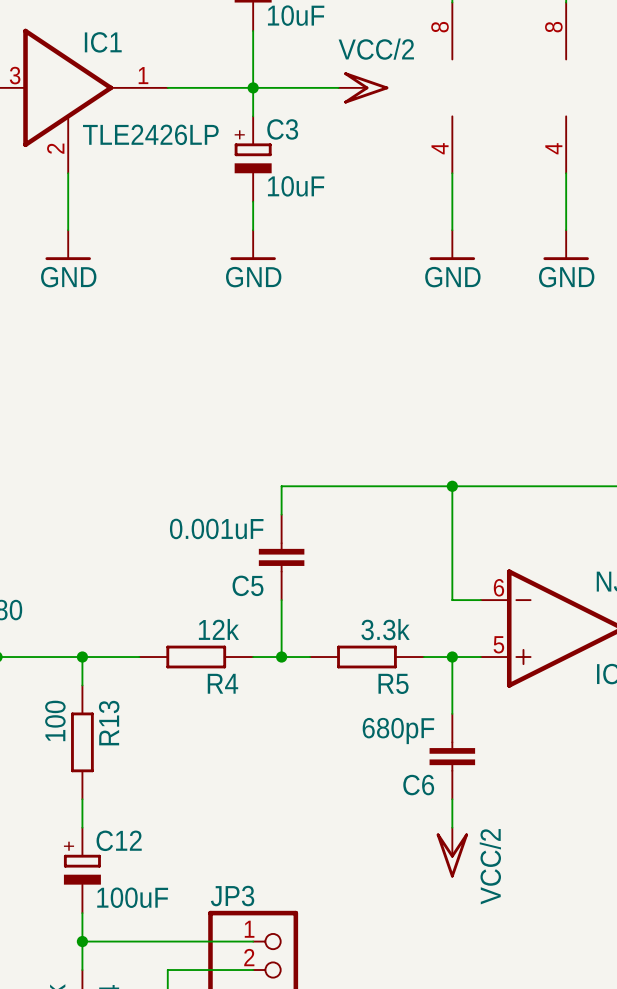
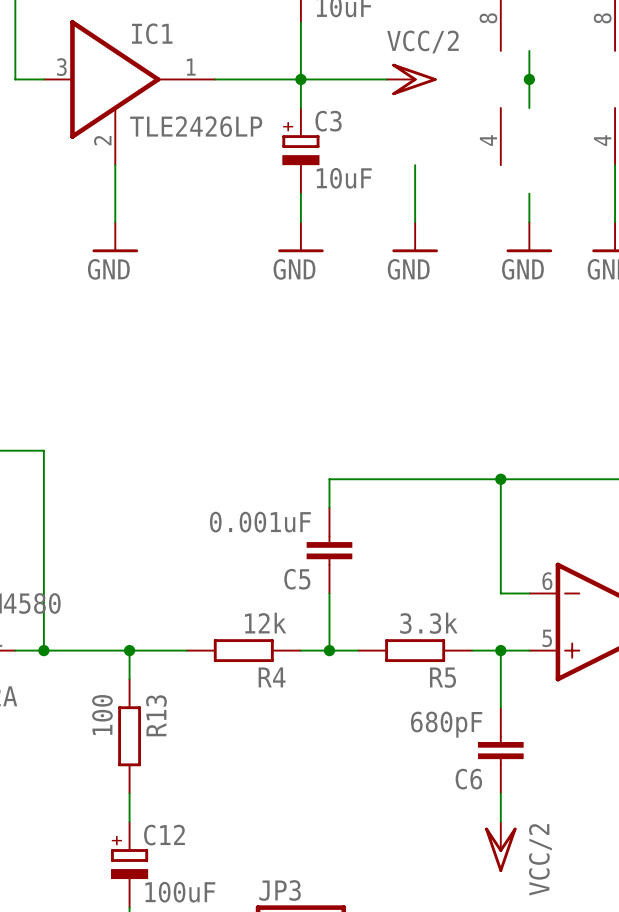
wire: none -> (529, 50) (529, 108)
junction: none -> (529, 79)
wire: (452, 173) (452, 230) -> (415, 165) (415, 222)
wire: none -> (529, 193) (529, 222)
power symbol: none -> GND (415, 237)
power symbol position: GND (452, 245) -> GND (529, 237)

